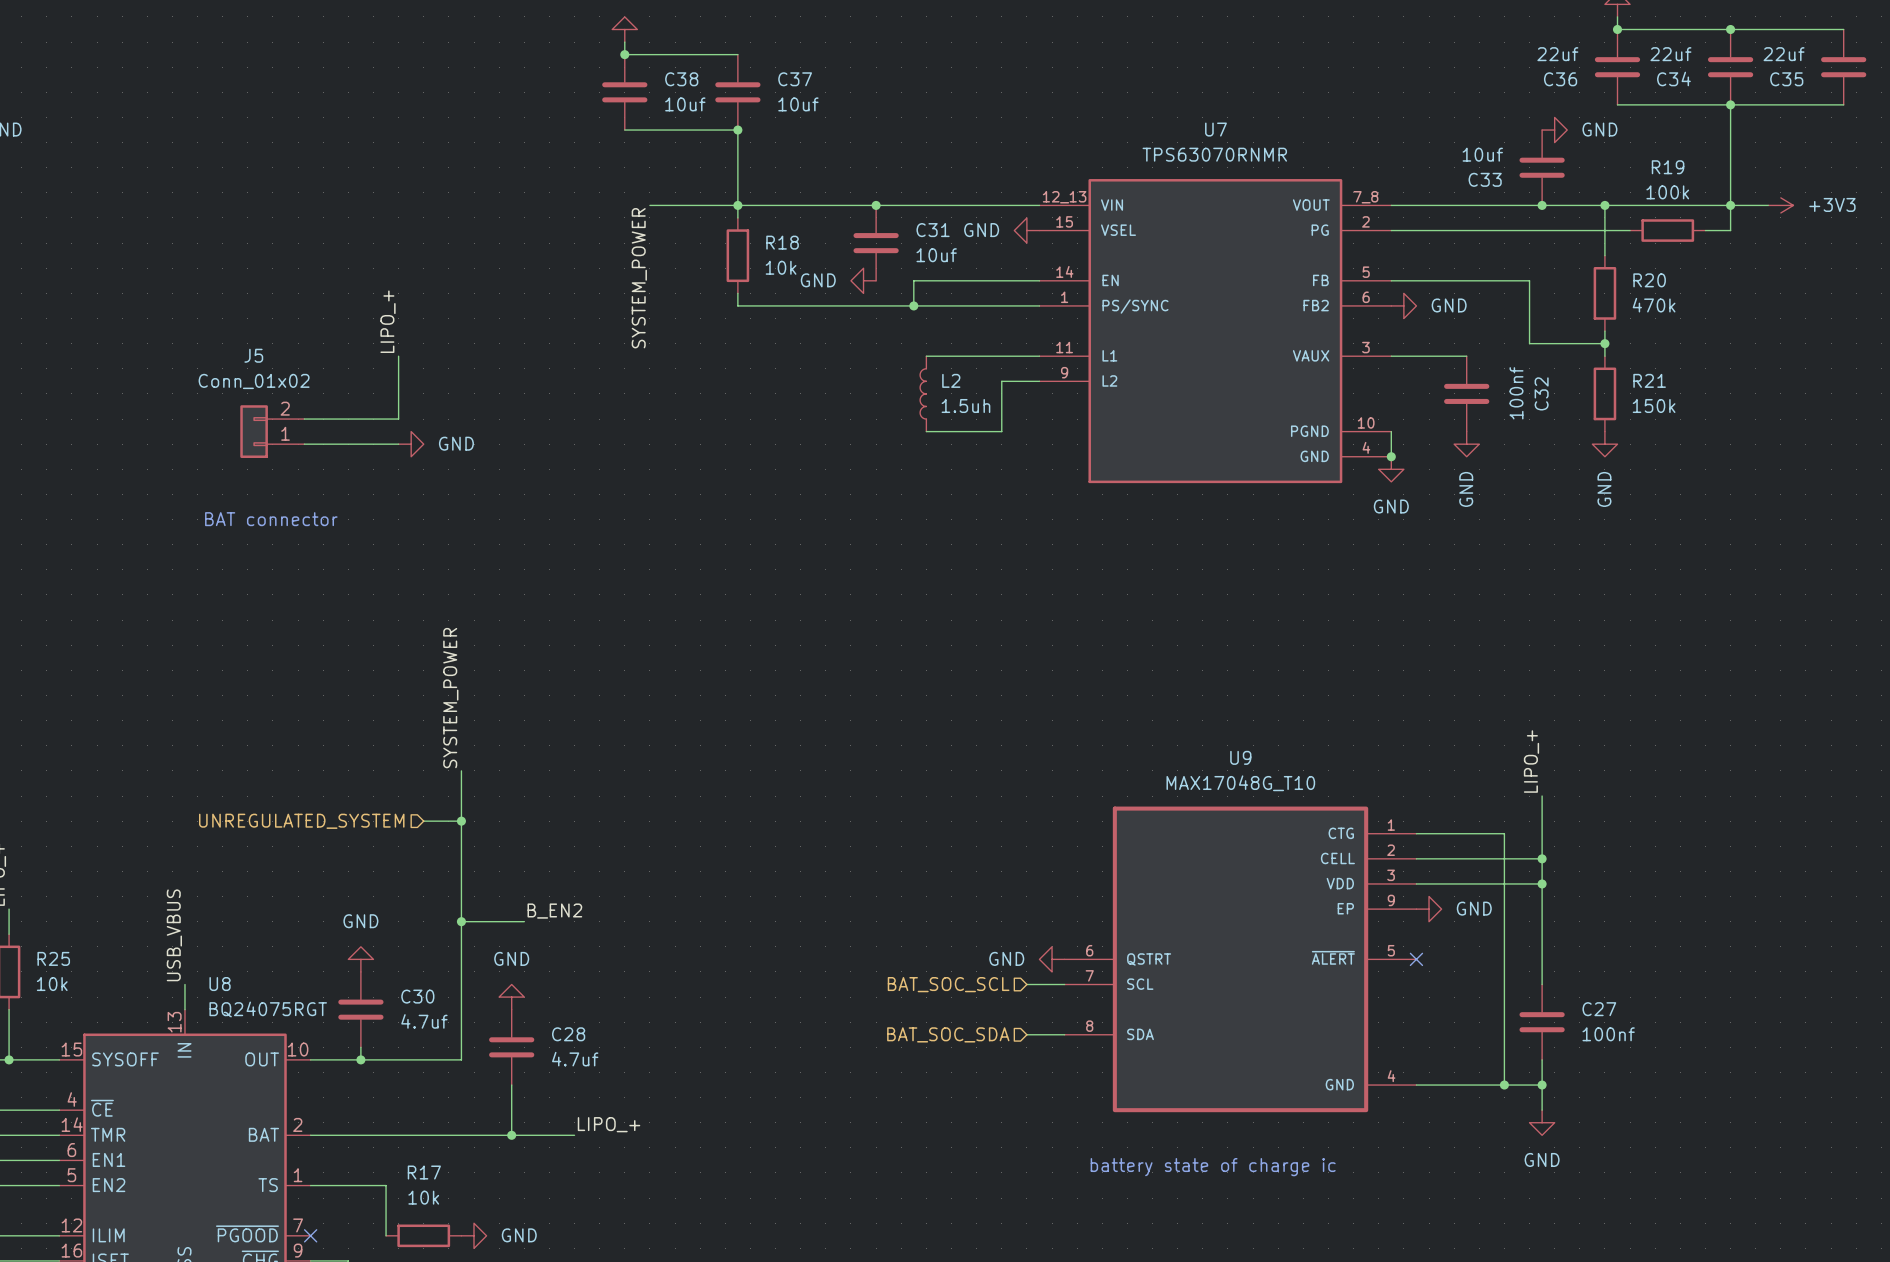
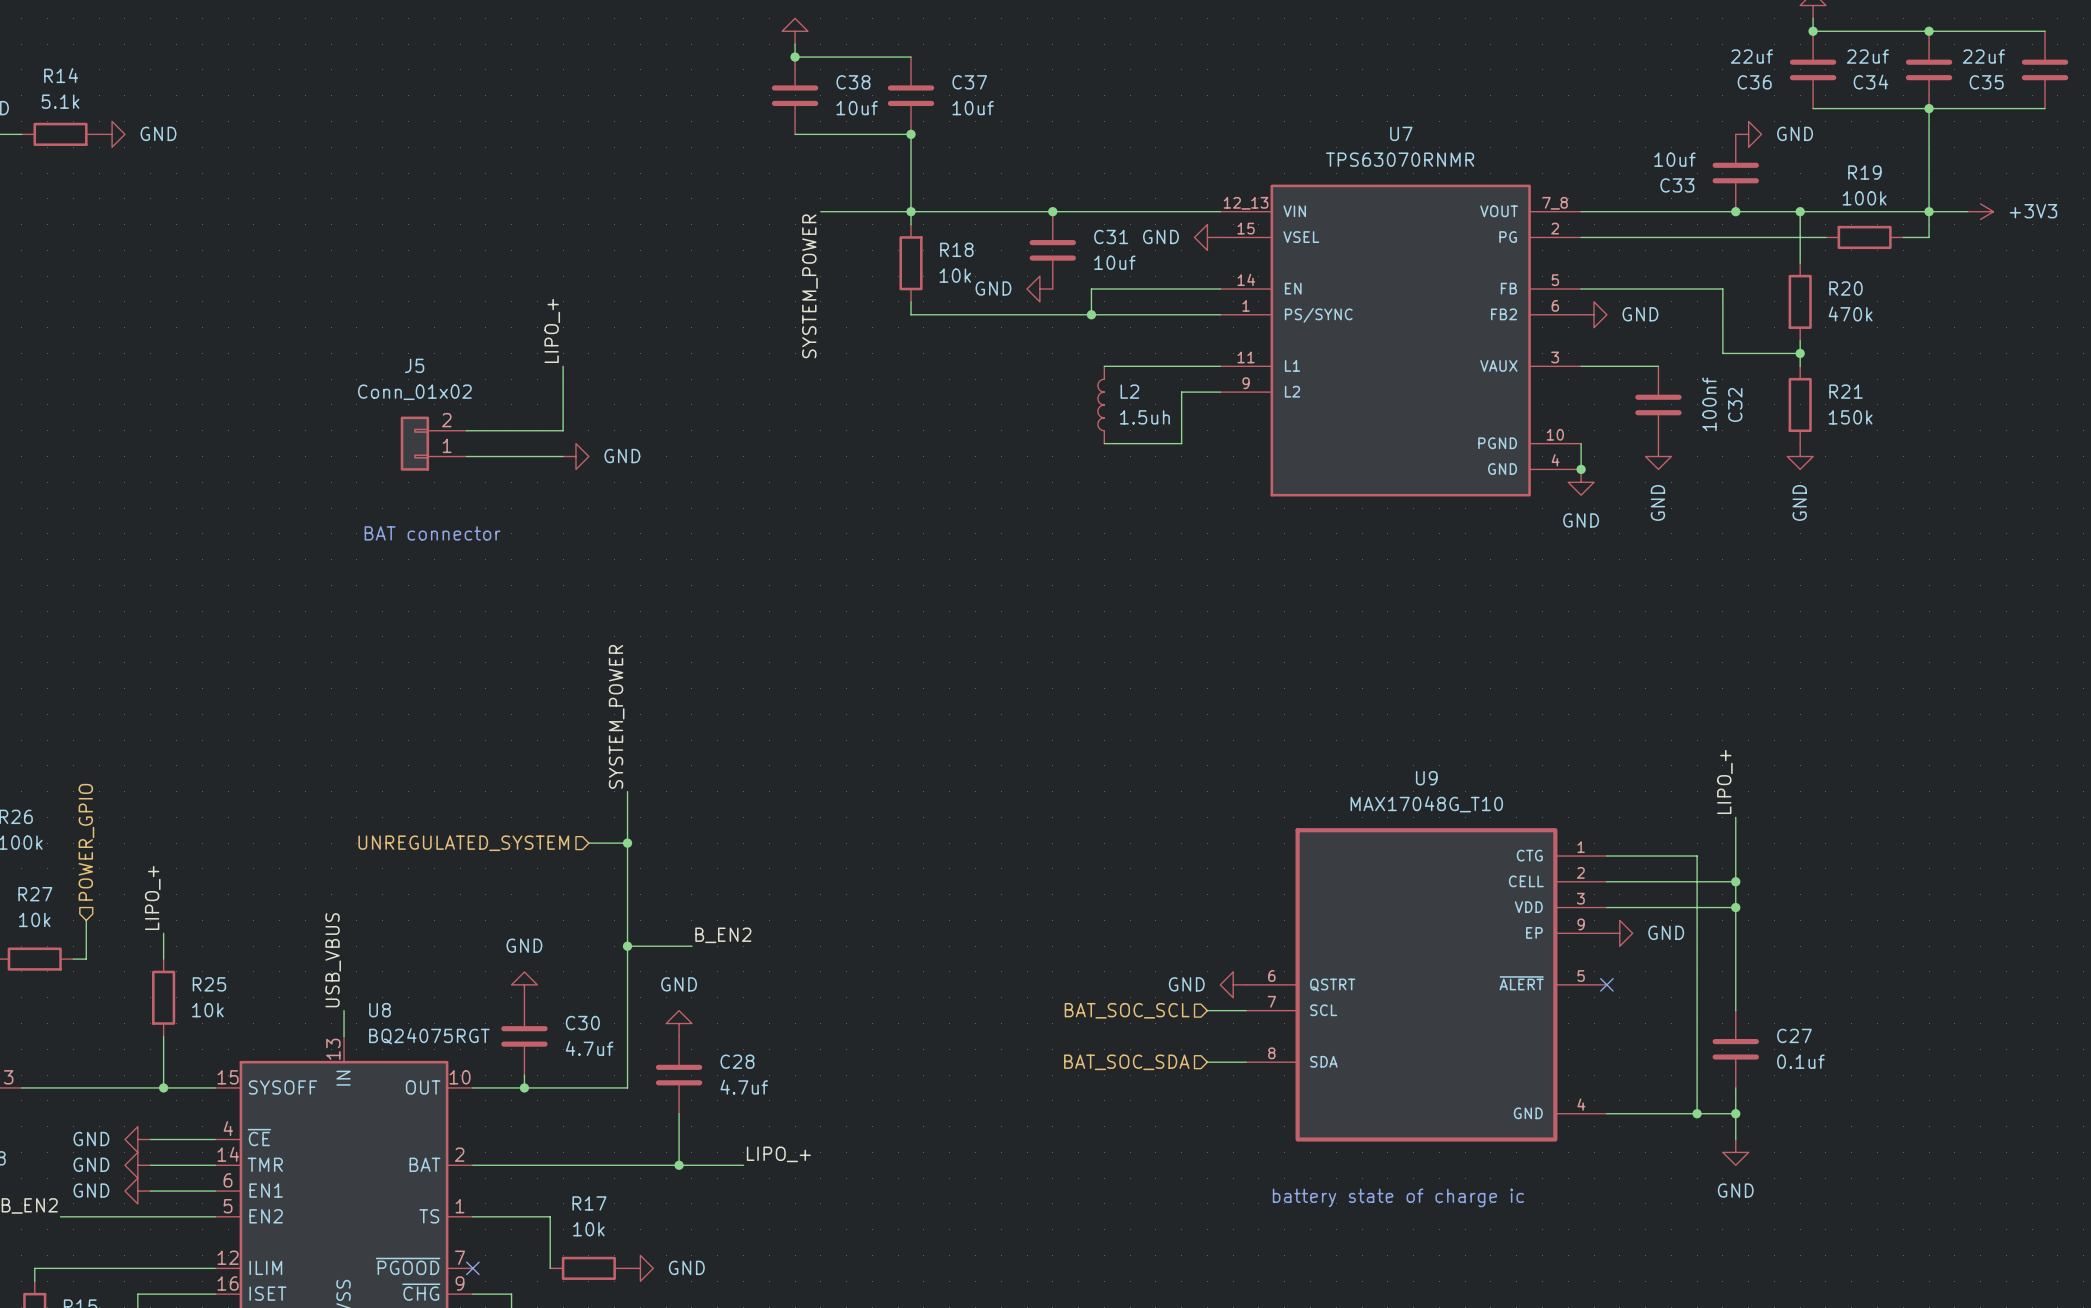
C27 value: 100nf (1608, 1034) -> 0.1uf (1800, 1061)

